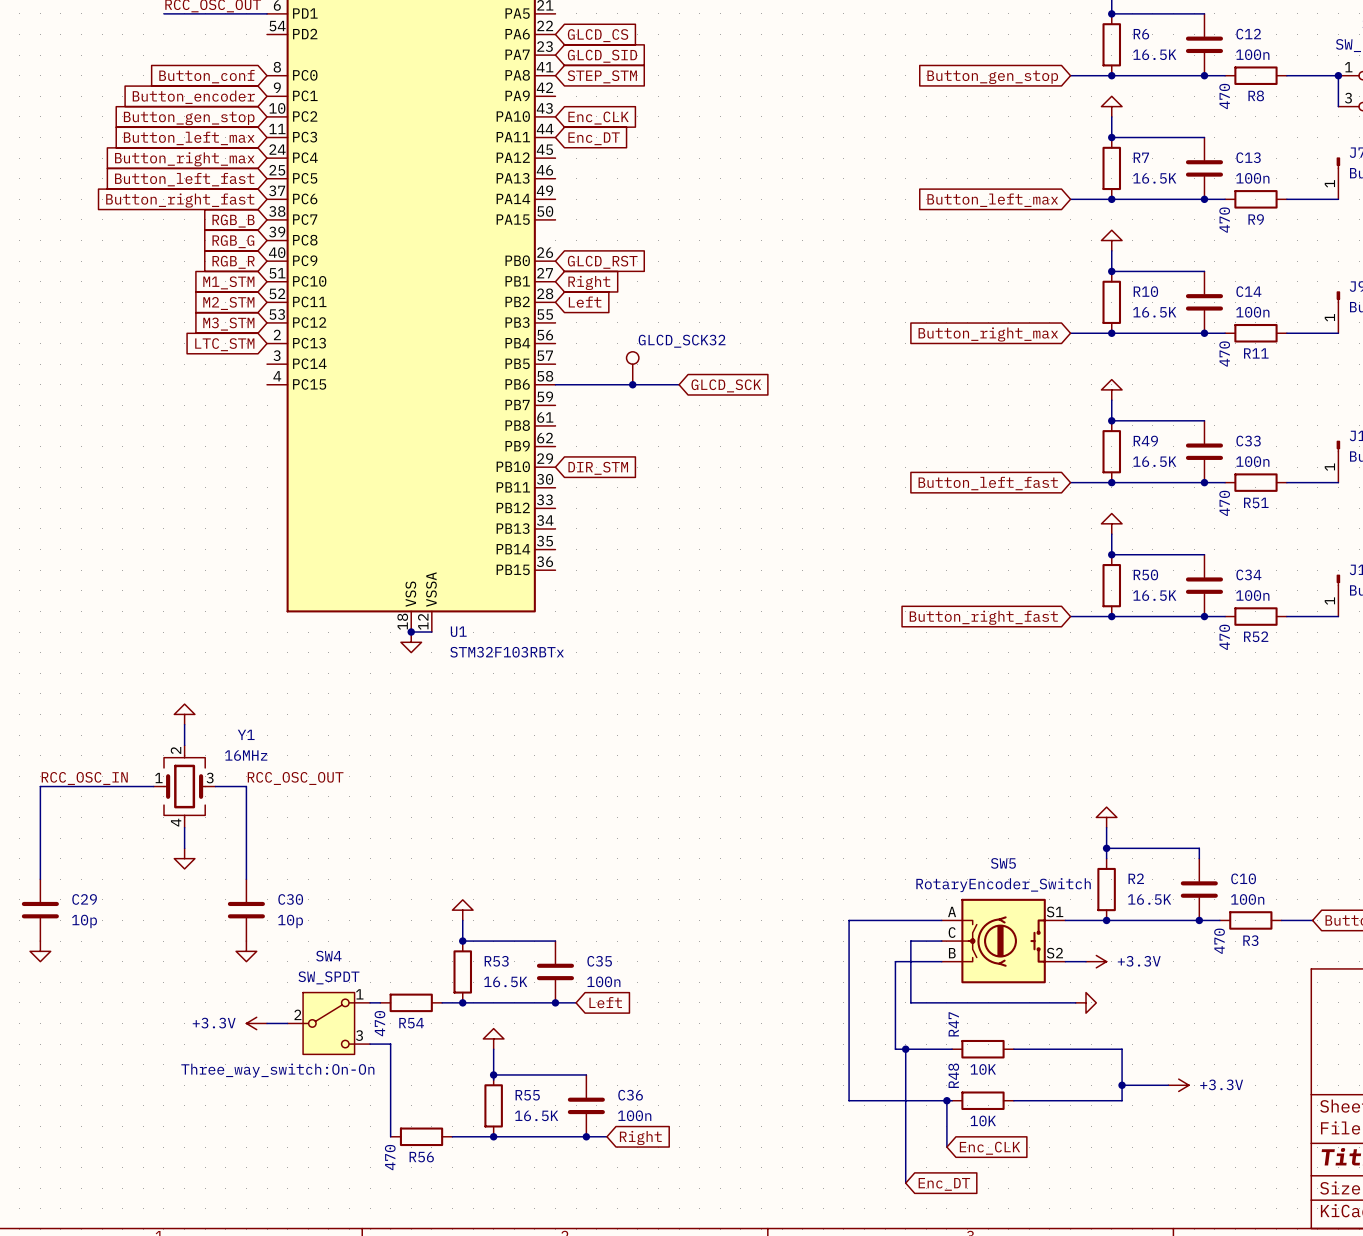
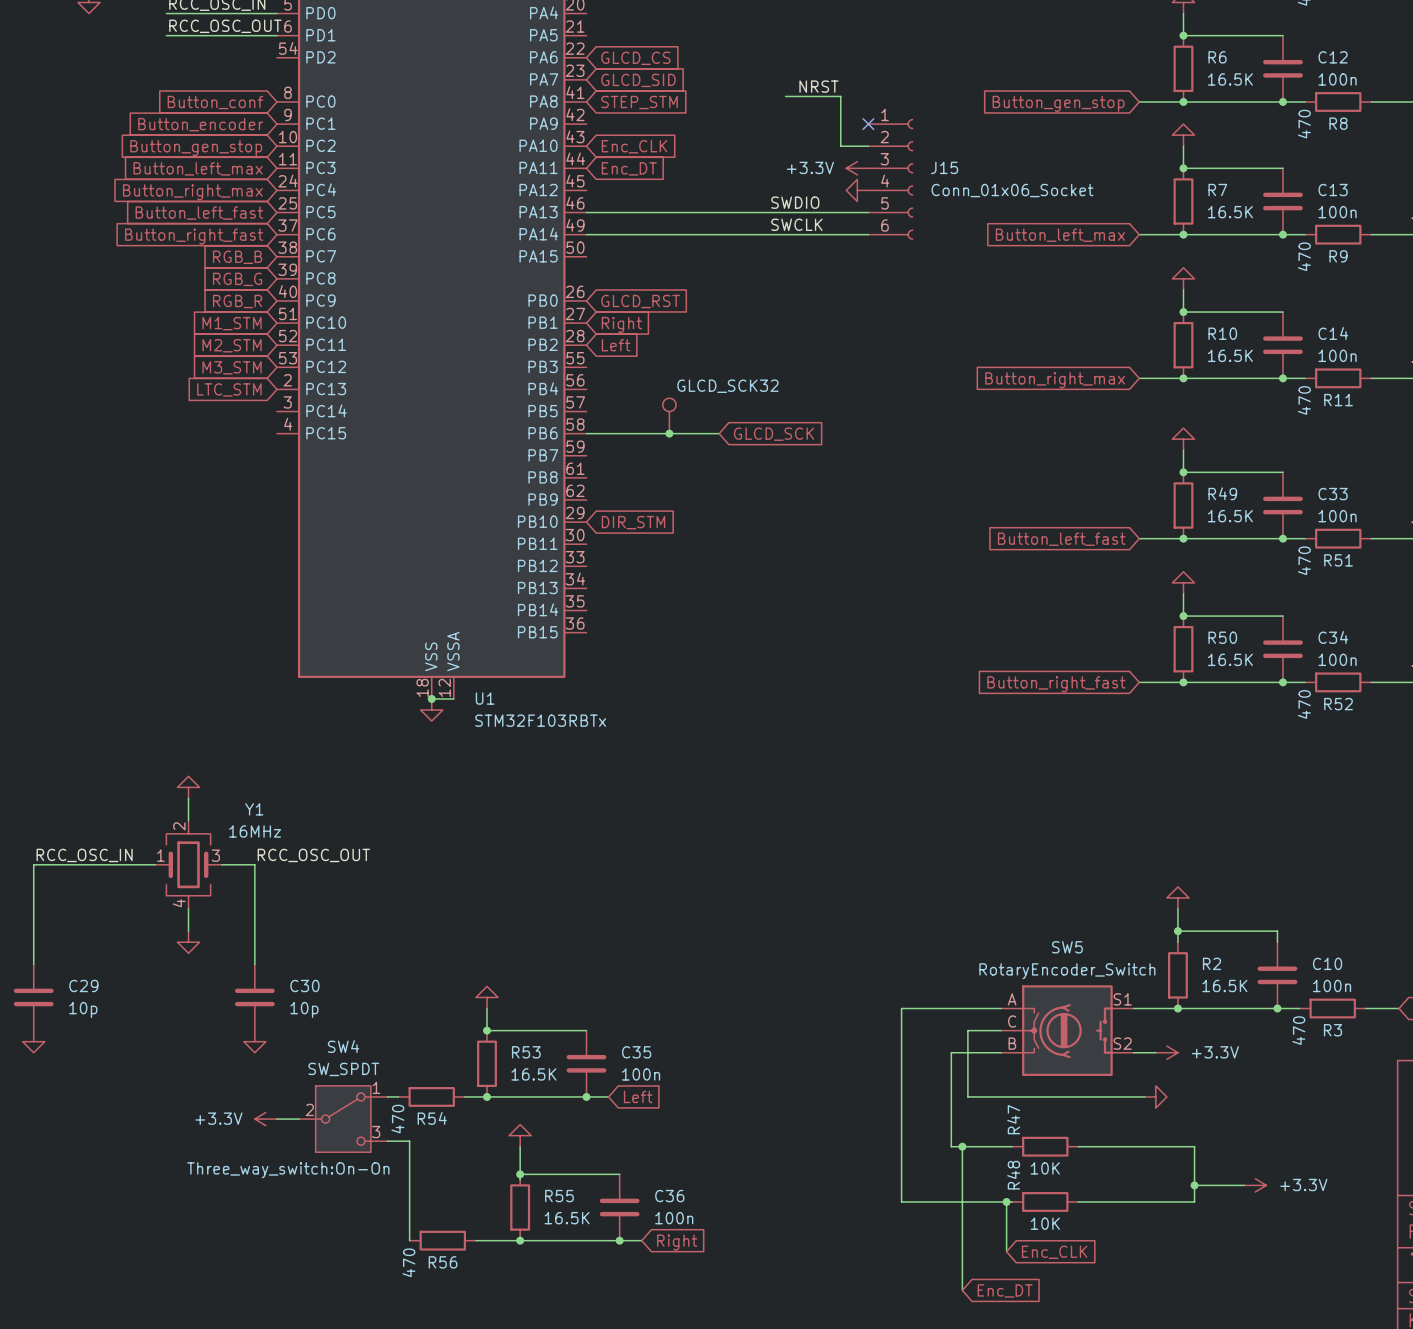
label: none -> NRST (819, 86)
wire: none -> (785, 96) (840, 96) (840, 146) (868, 146)
no-connect mark: none -> (868, 124)
power symbol: none -> +3.3V (857, 168)
J15: none -> Conn_01x06_Socket (890, 179)
power symbol: none -> (857, 190)
label: none -> SWDIO (795, 202)
wire: none -> (586, 212) (868, 212)
label: none -> SWCLK (796, 224)
wire: none -> (586, 234) (868, 234)

